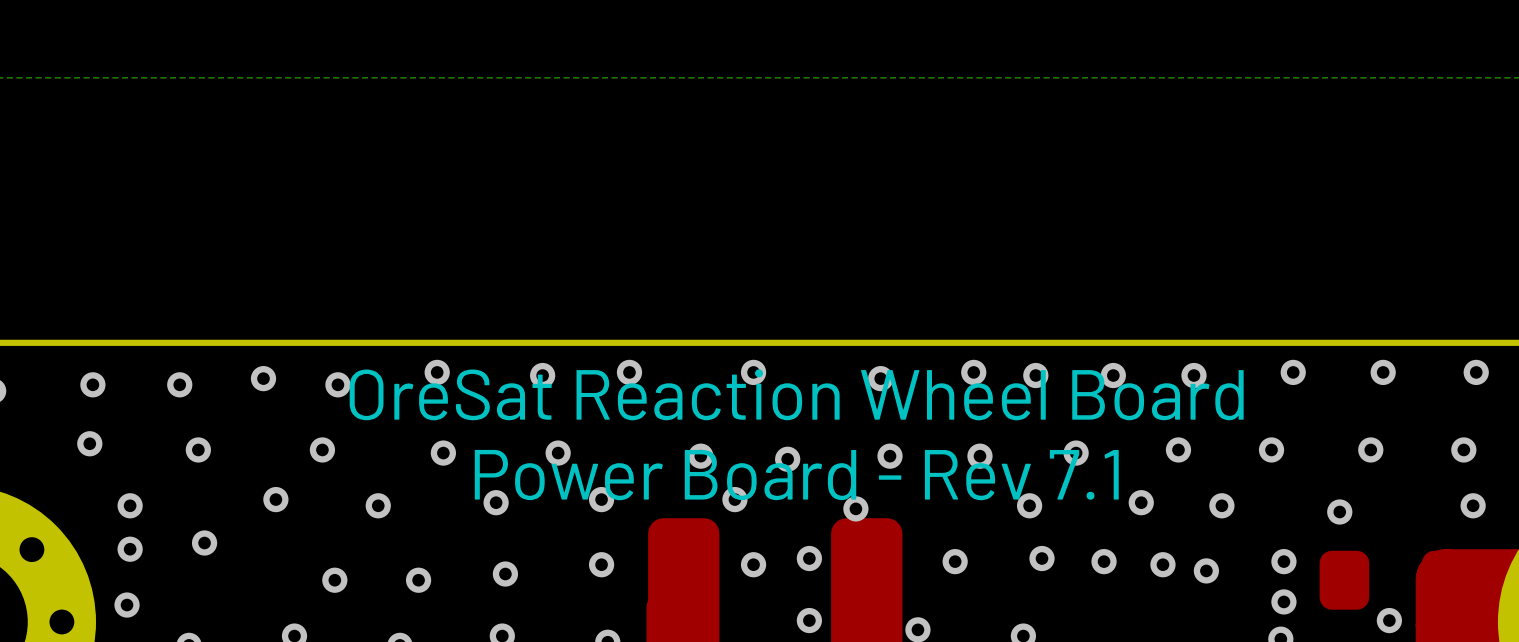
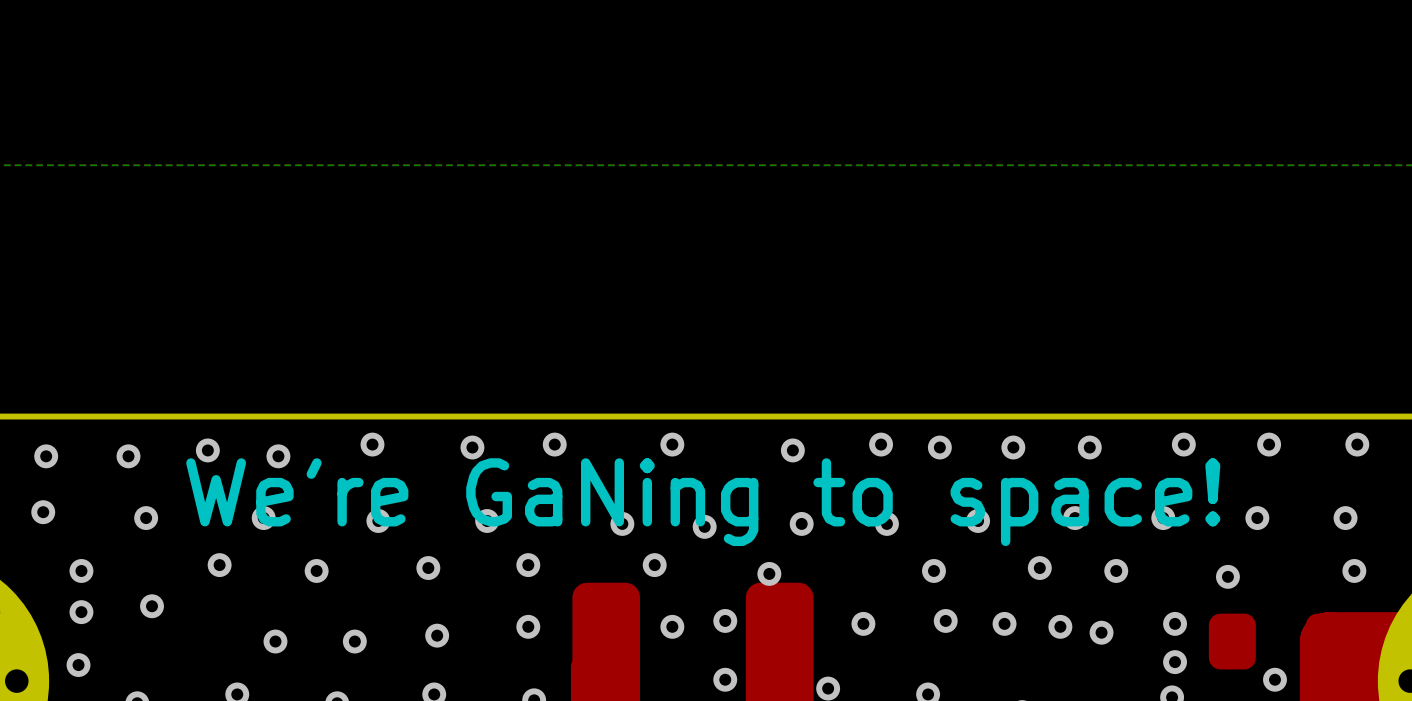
text: OreSat Reaction Wheel Board (796, 394) -> none
text: none -> We're GaNing to space! (703, 502)
text: Power Board - Rev 7.1 (796, 475) -> none

